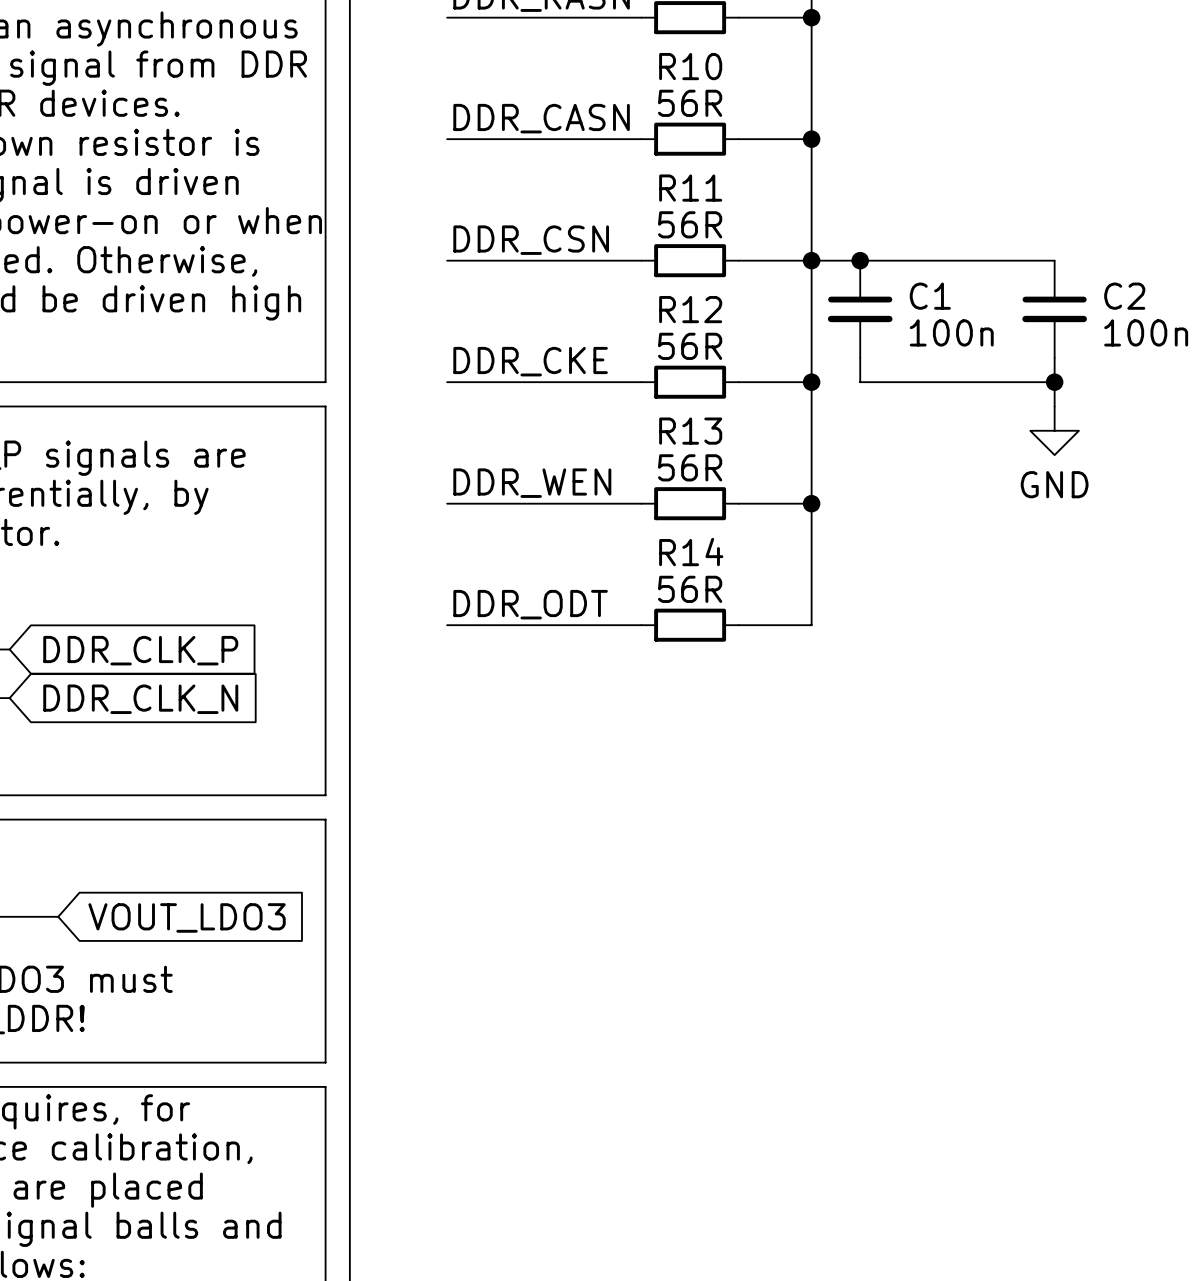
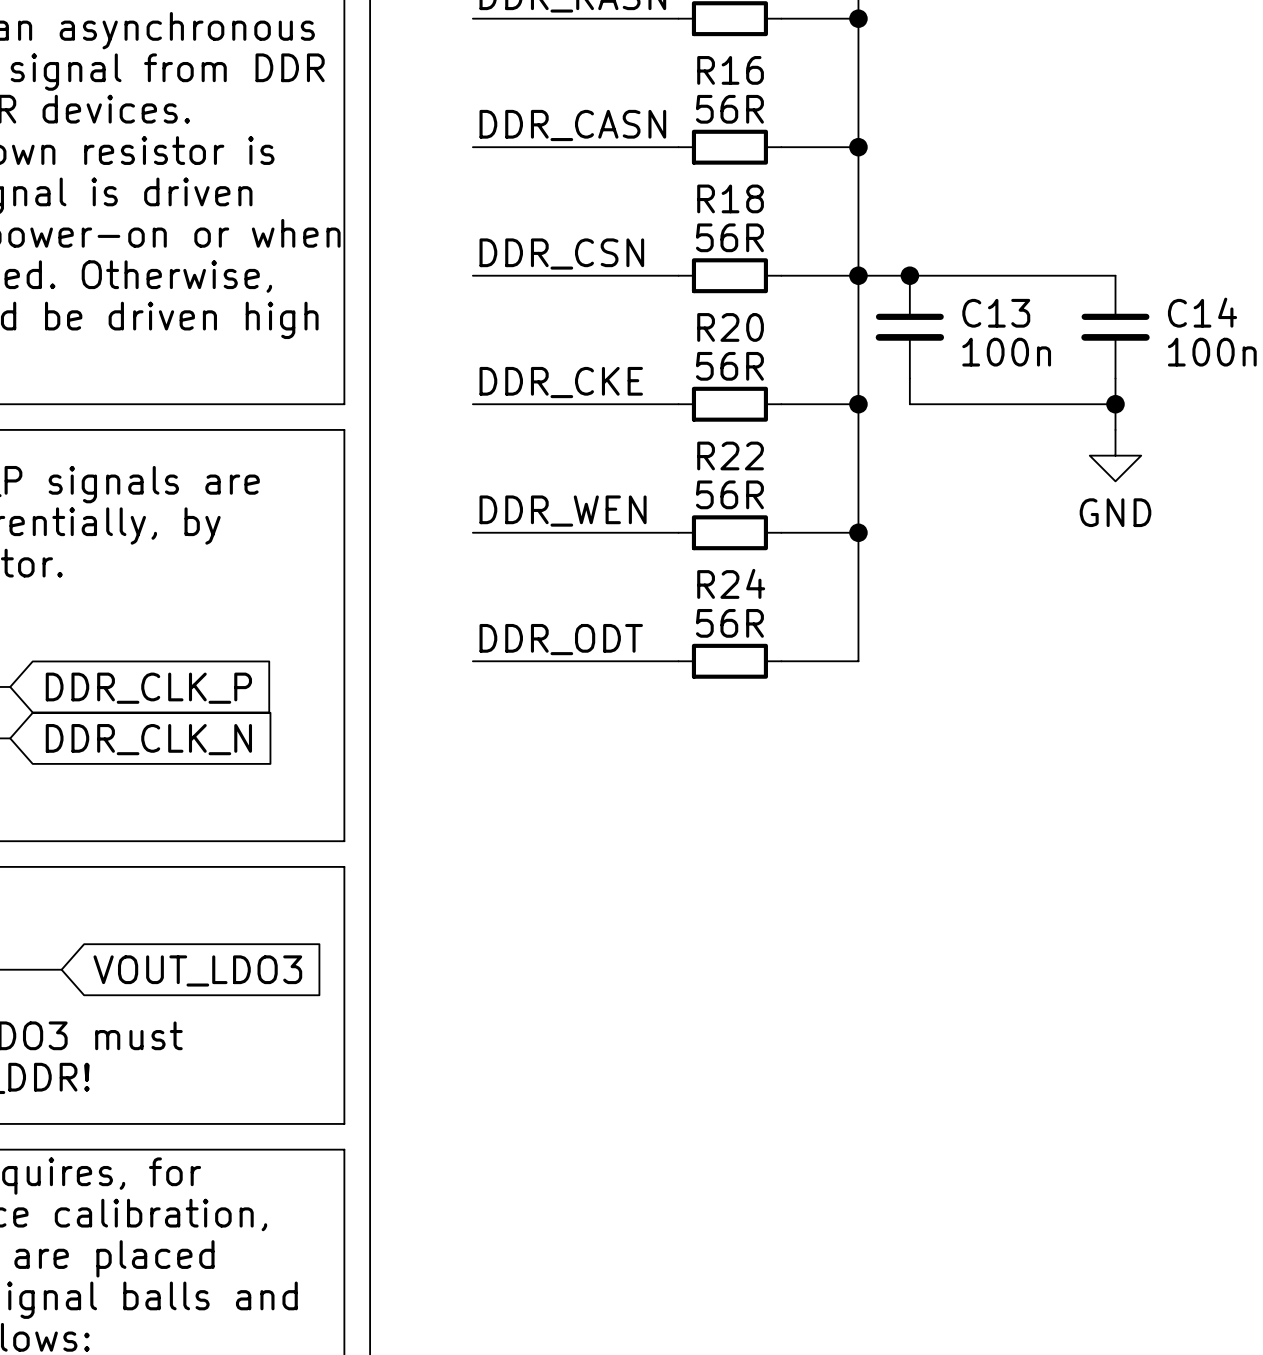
R10 name: R10 (690, 66) -> R16 (730, 70)
R11 name: R11 (690, 188) -> R18 (730, 198)
C1 name: C1 (930, 296) -> C13 (996, 313)
C2 name: C2 (1124, 296) -> C14 (1202, 312)
R12 name: R12 (690, 309) -> R20 (730, 327)
R13 name: R13 (690, 431) -> R22 (730, 455)
R14 name: R14 (691, 552) -> R24 (731, 583)

